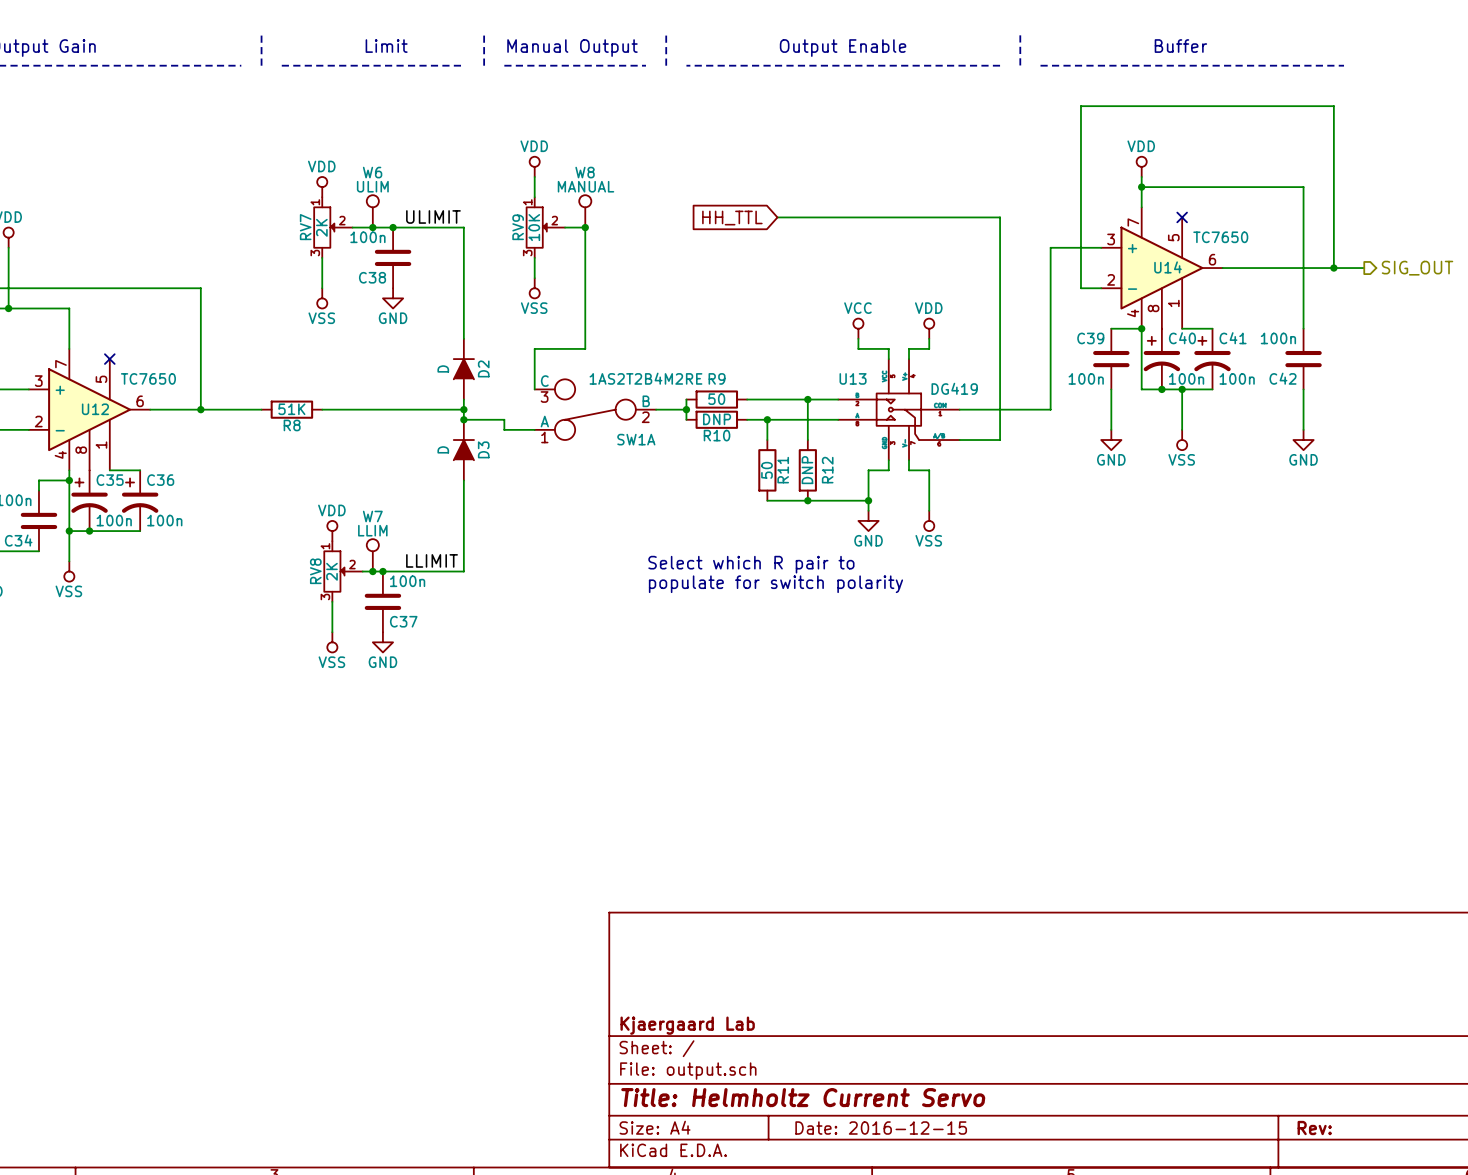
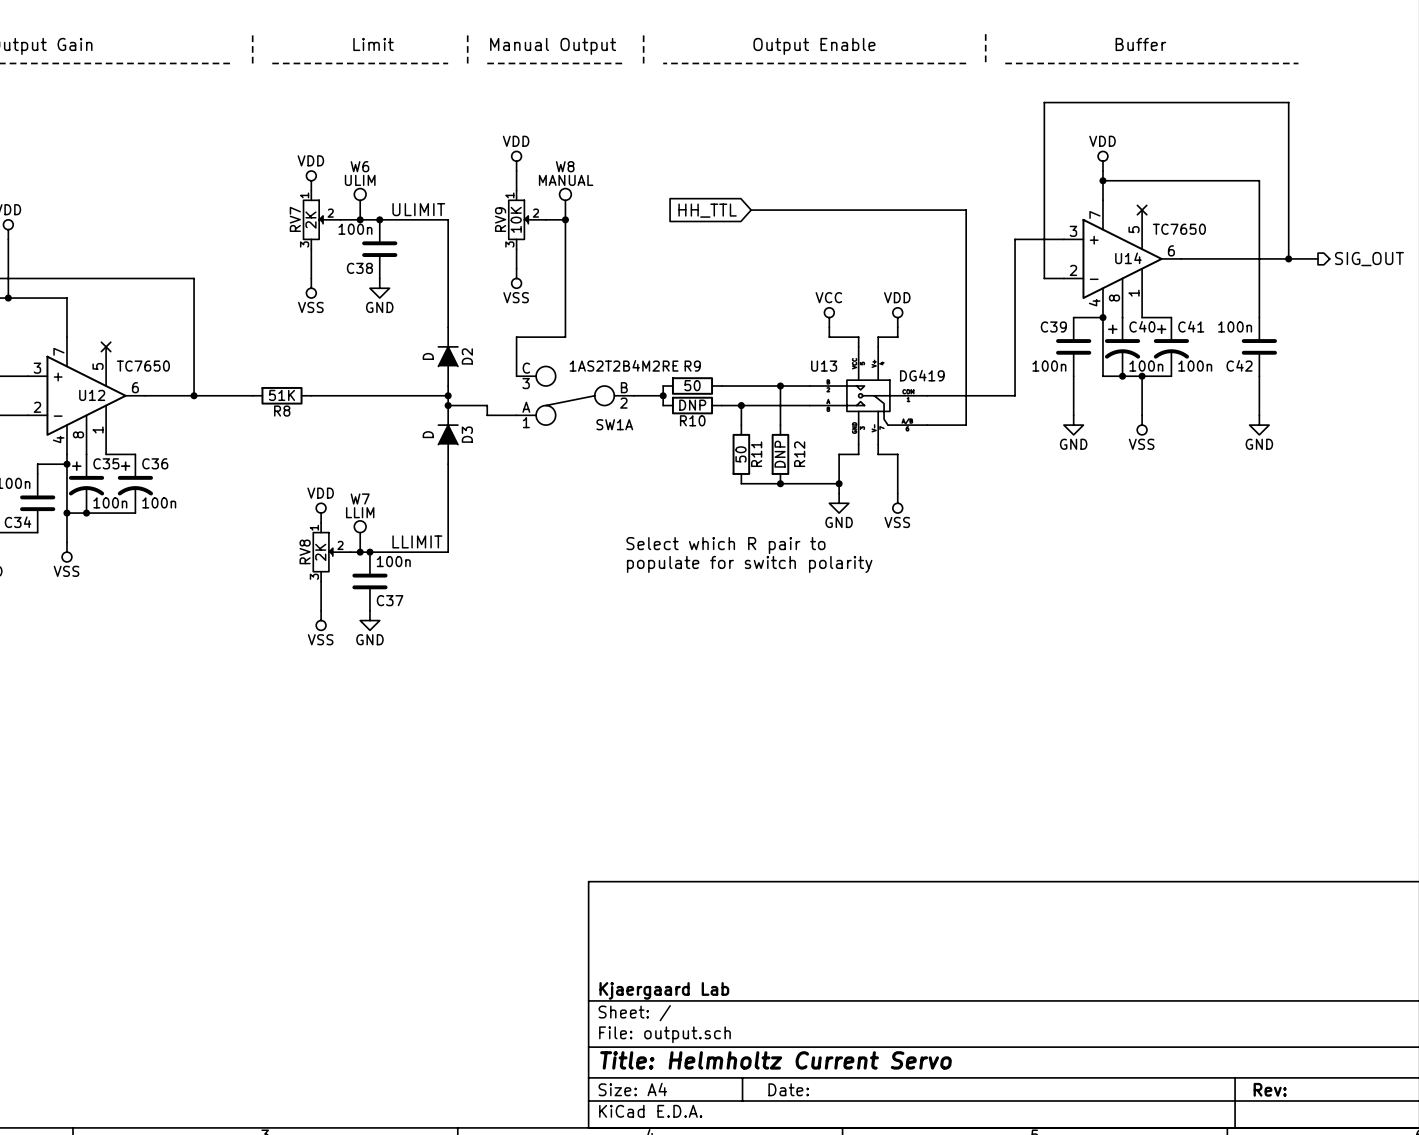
title block: Date: 2016-12-15 (881, 1128) -> Date: (788, 1089)

